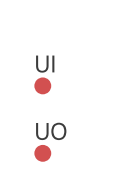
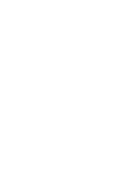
UI: (42, 85) -> none
UO: (42, 153) -> none

